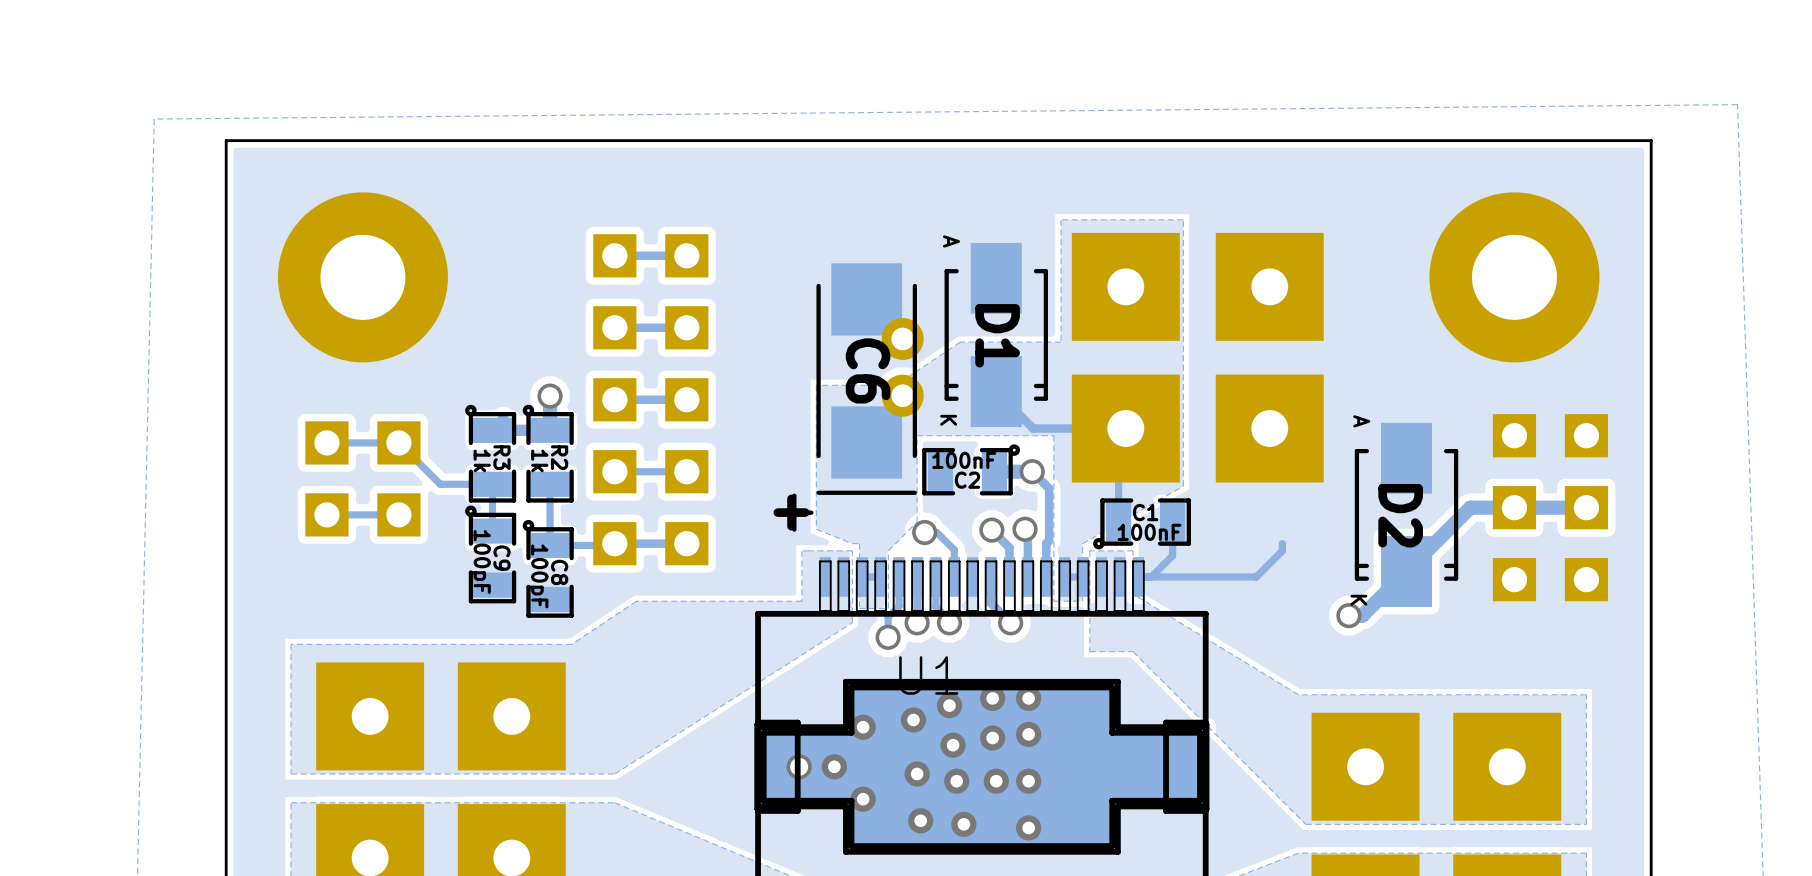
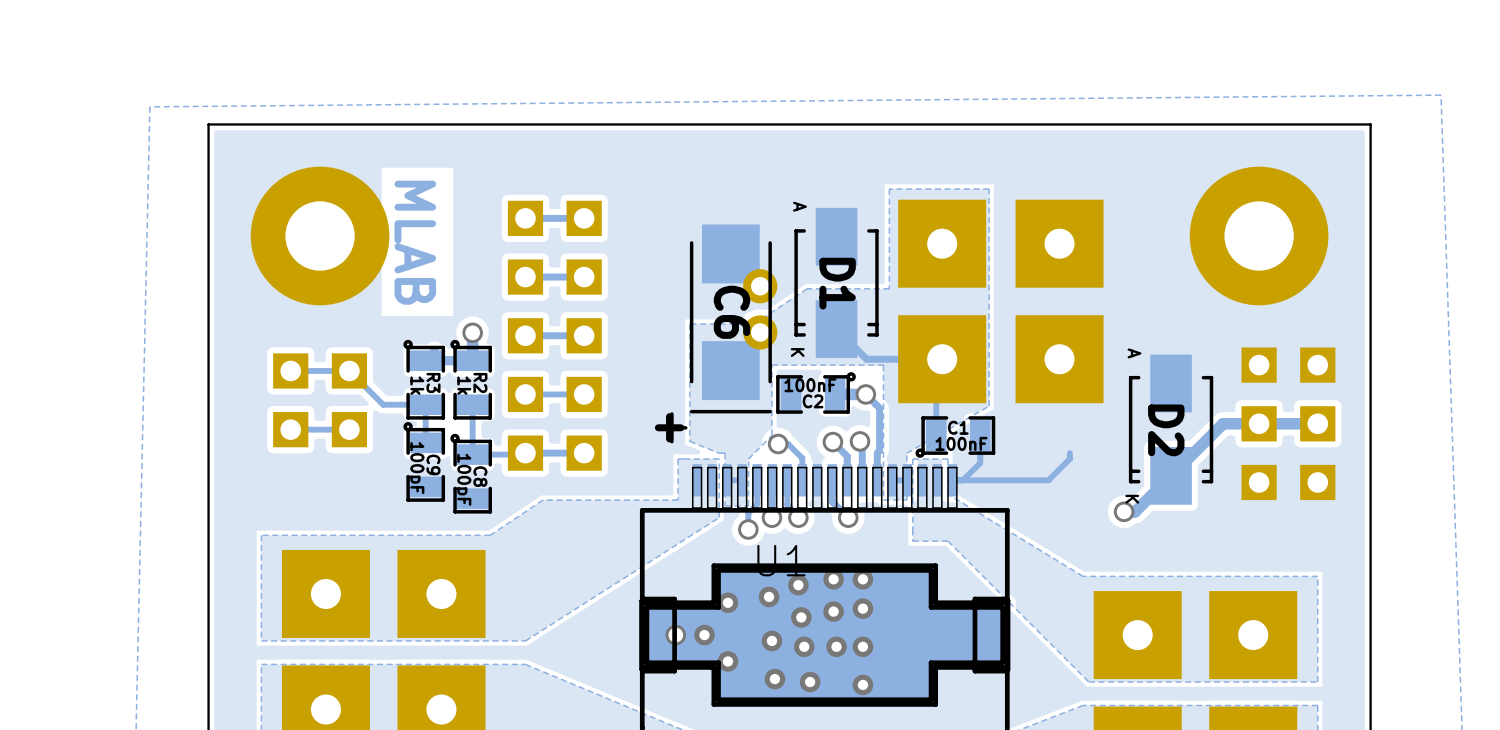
text: none -> MLAB (415, 242)

